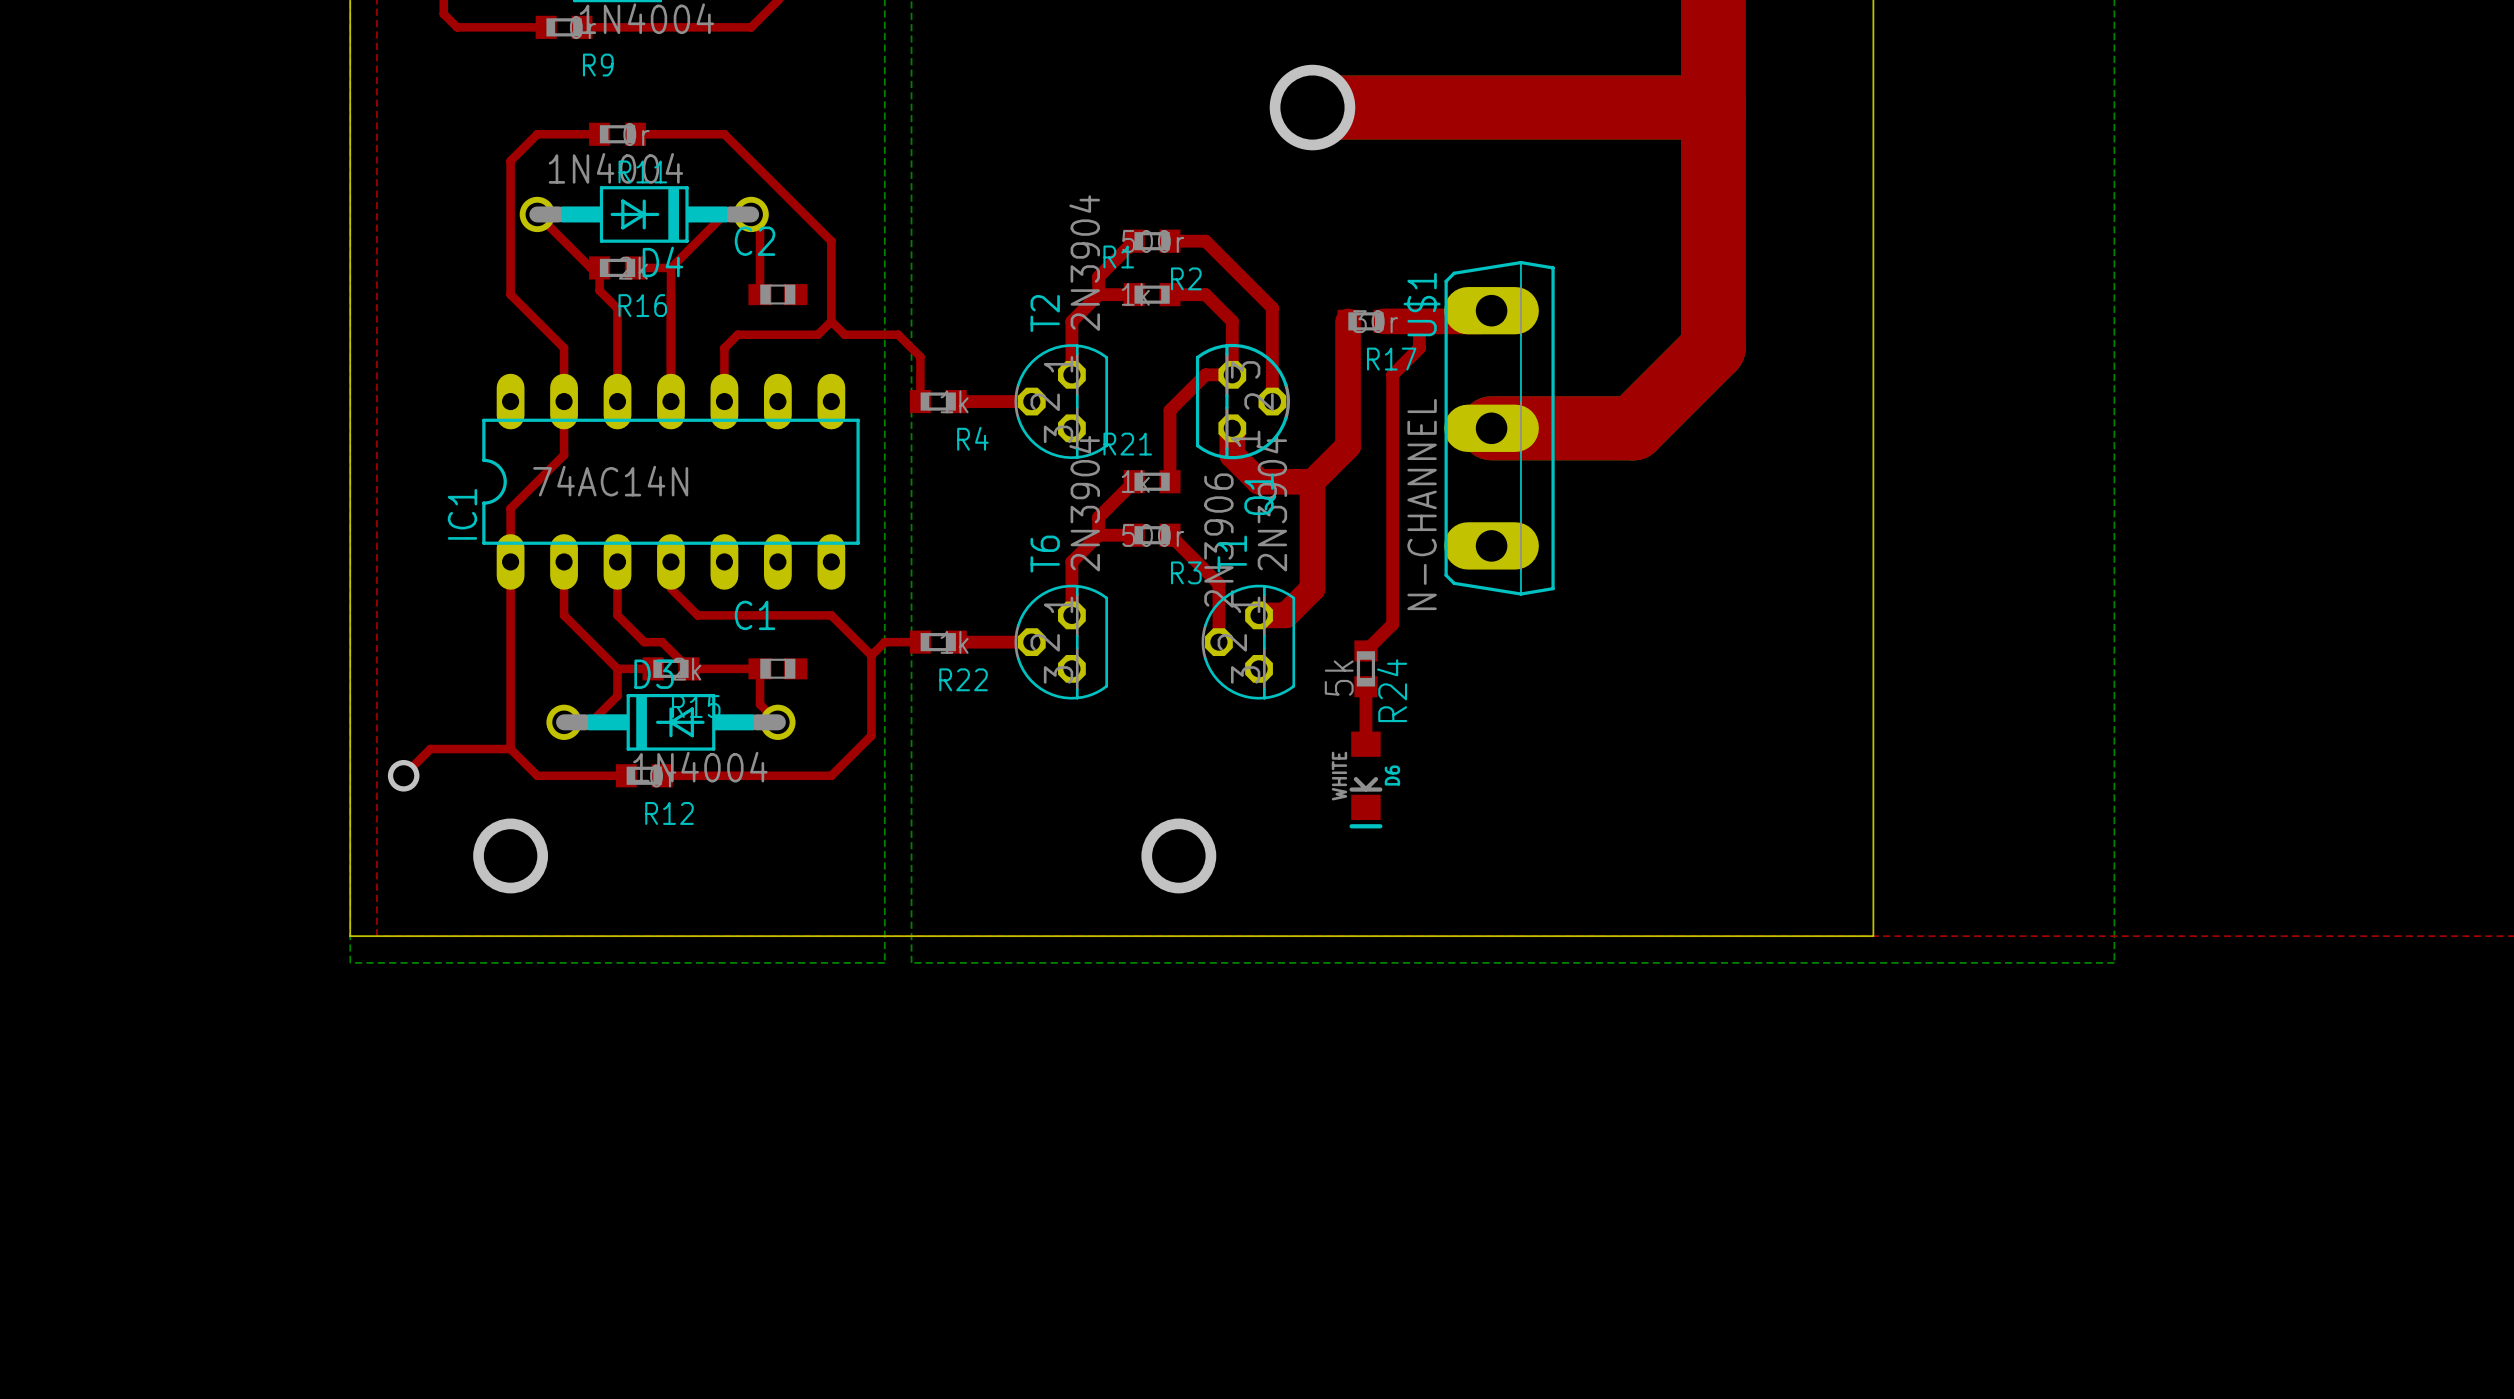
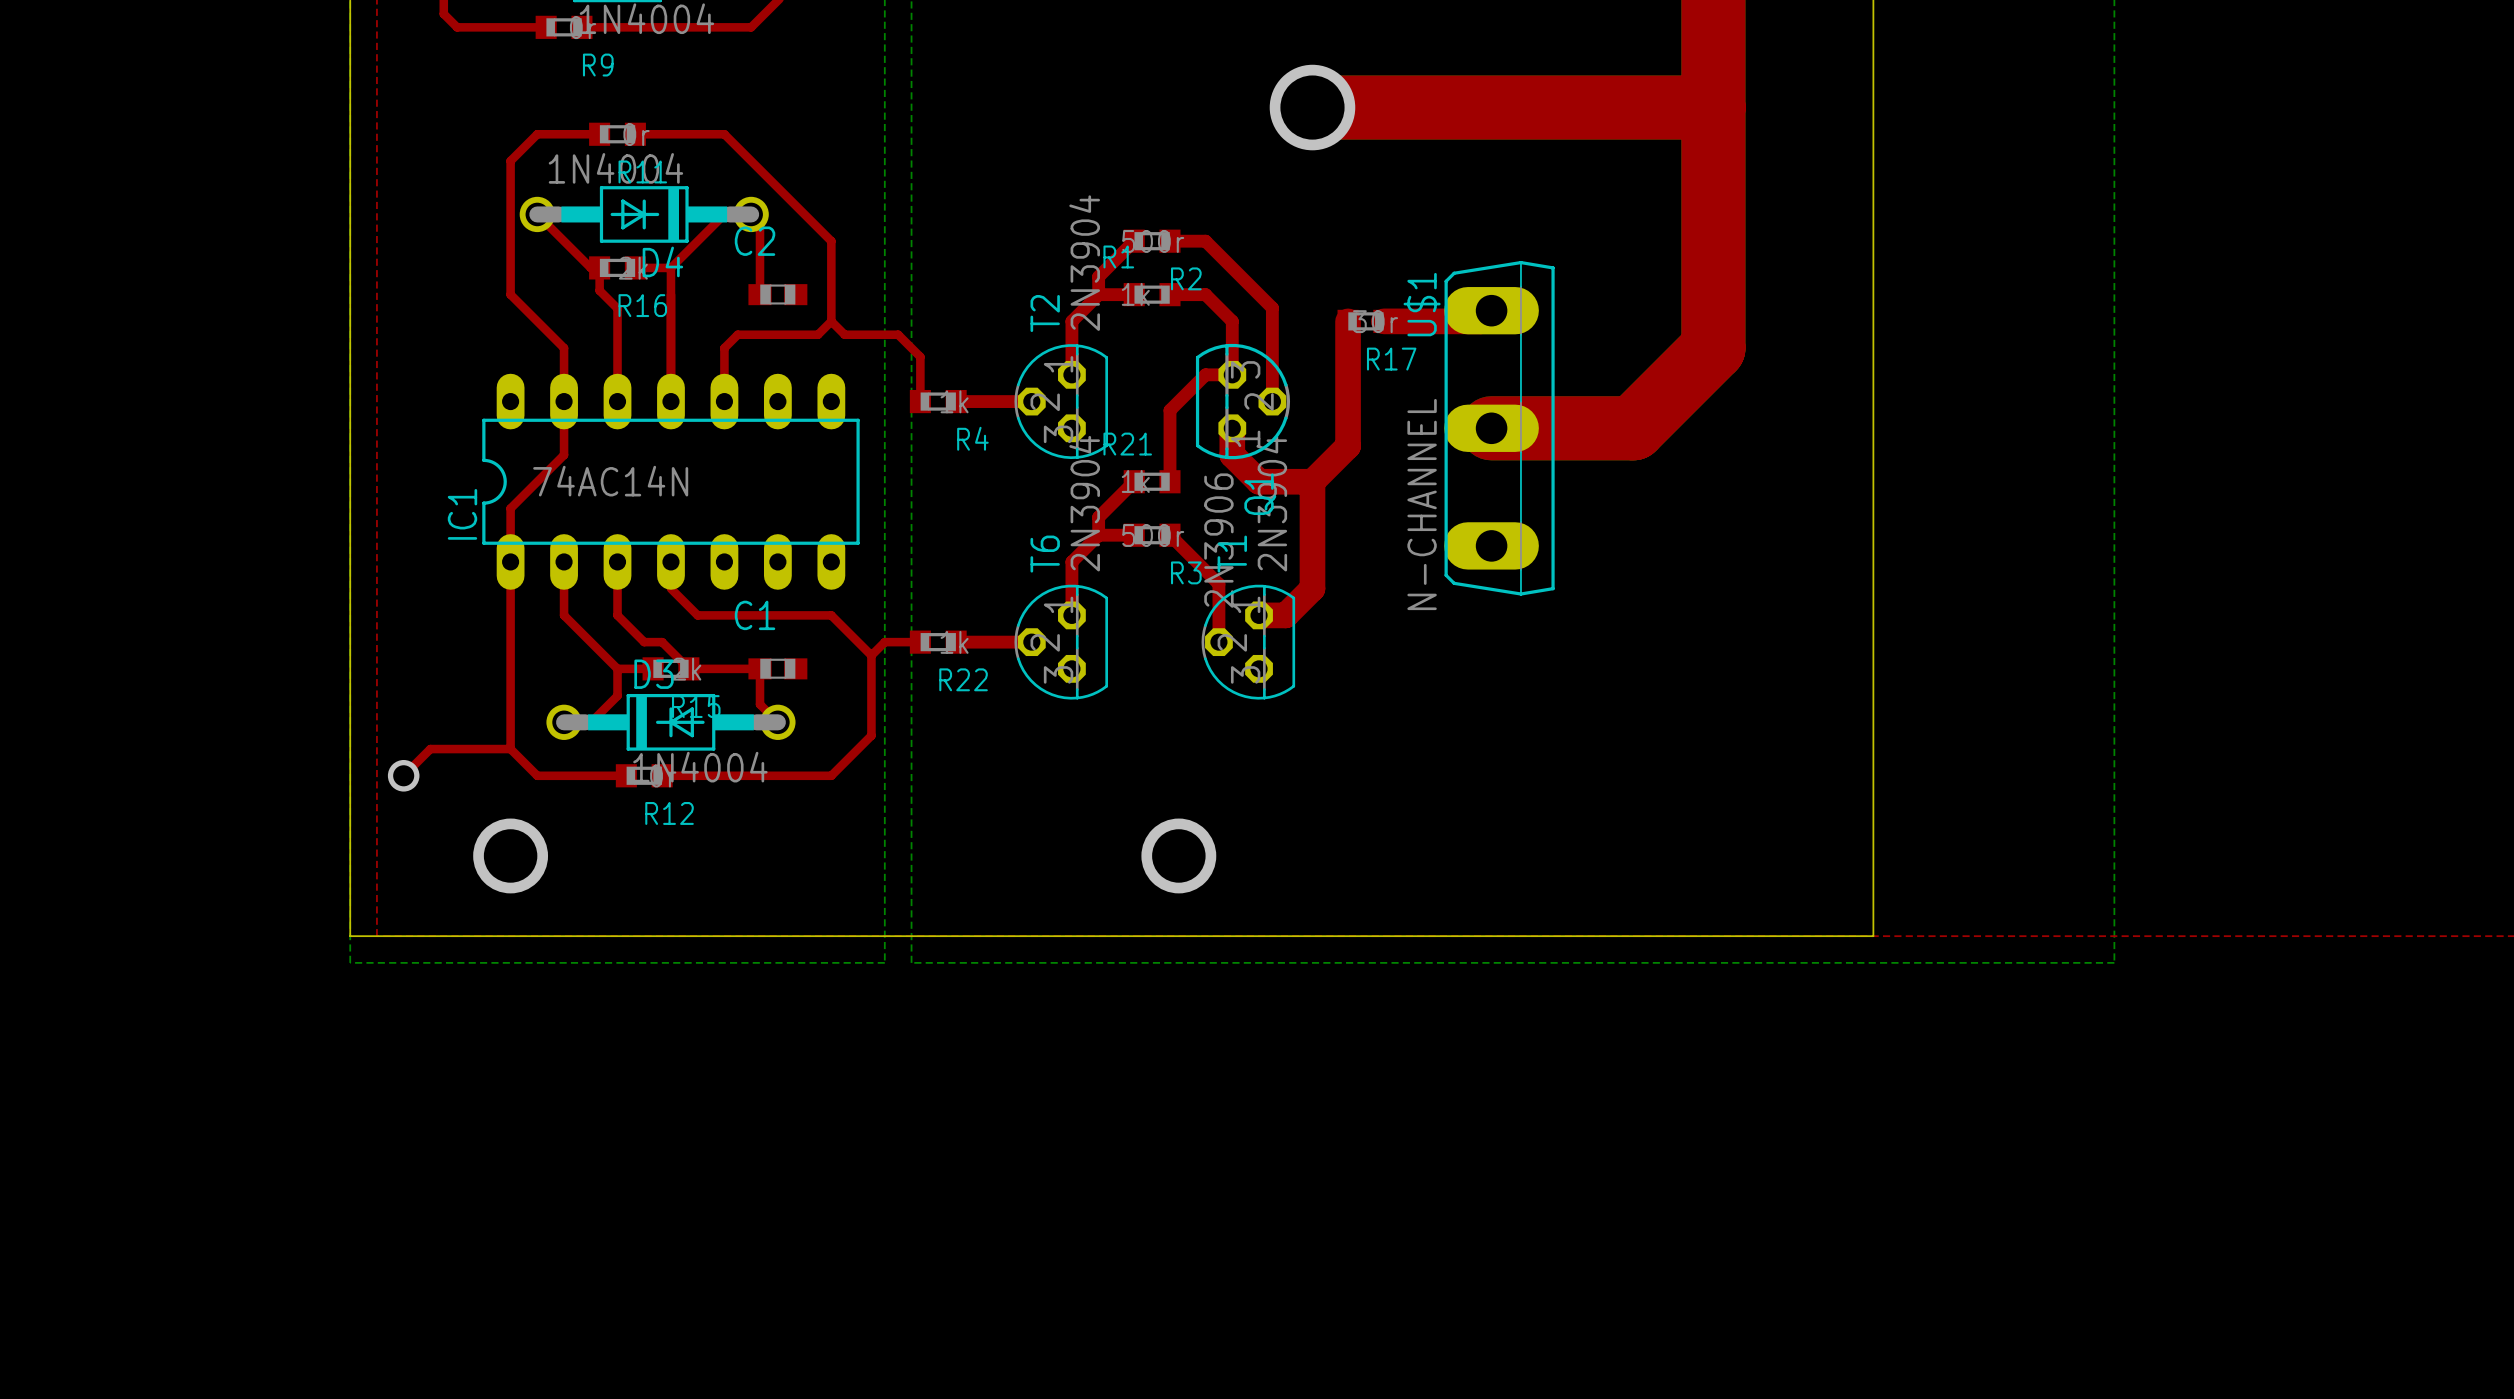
top track: (1419, 321) (1419, 348) (1392, 374) (1392, 624) (1365, 650) -> none
R24: 5k (1365, 668) -> none
top track: (1365, 686) (1365, 744) -> none
D6: WHITE (1365, 780) -> none

